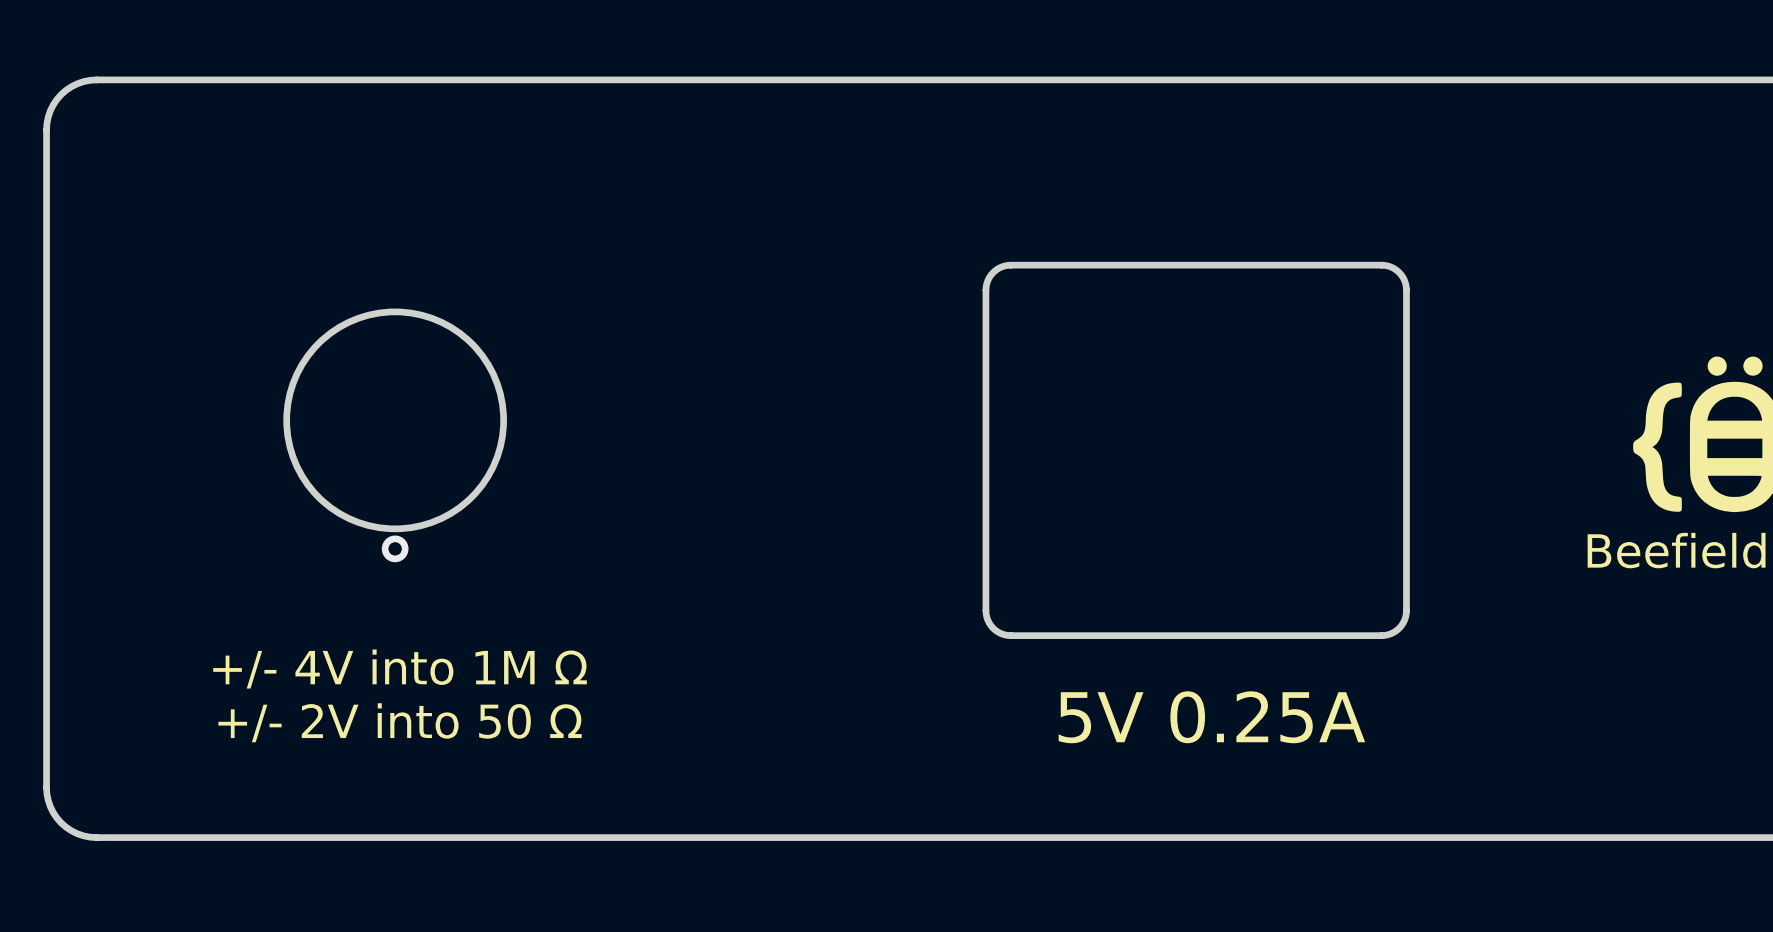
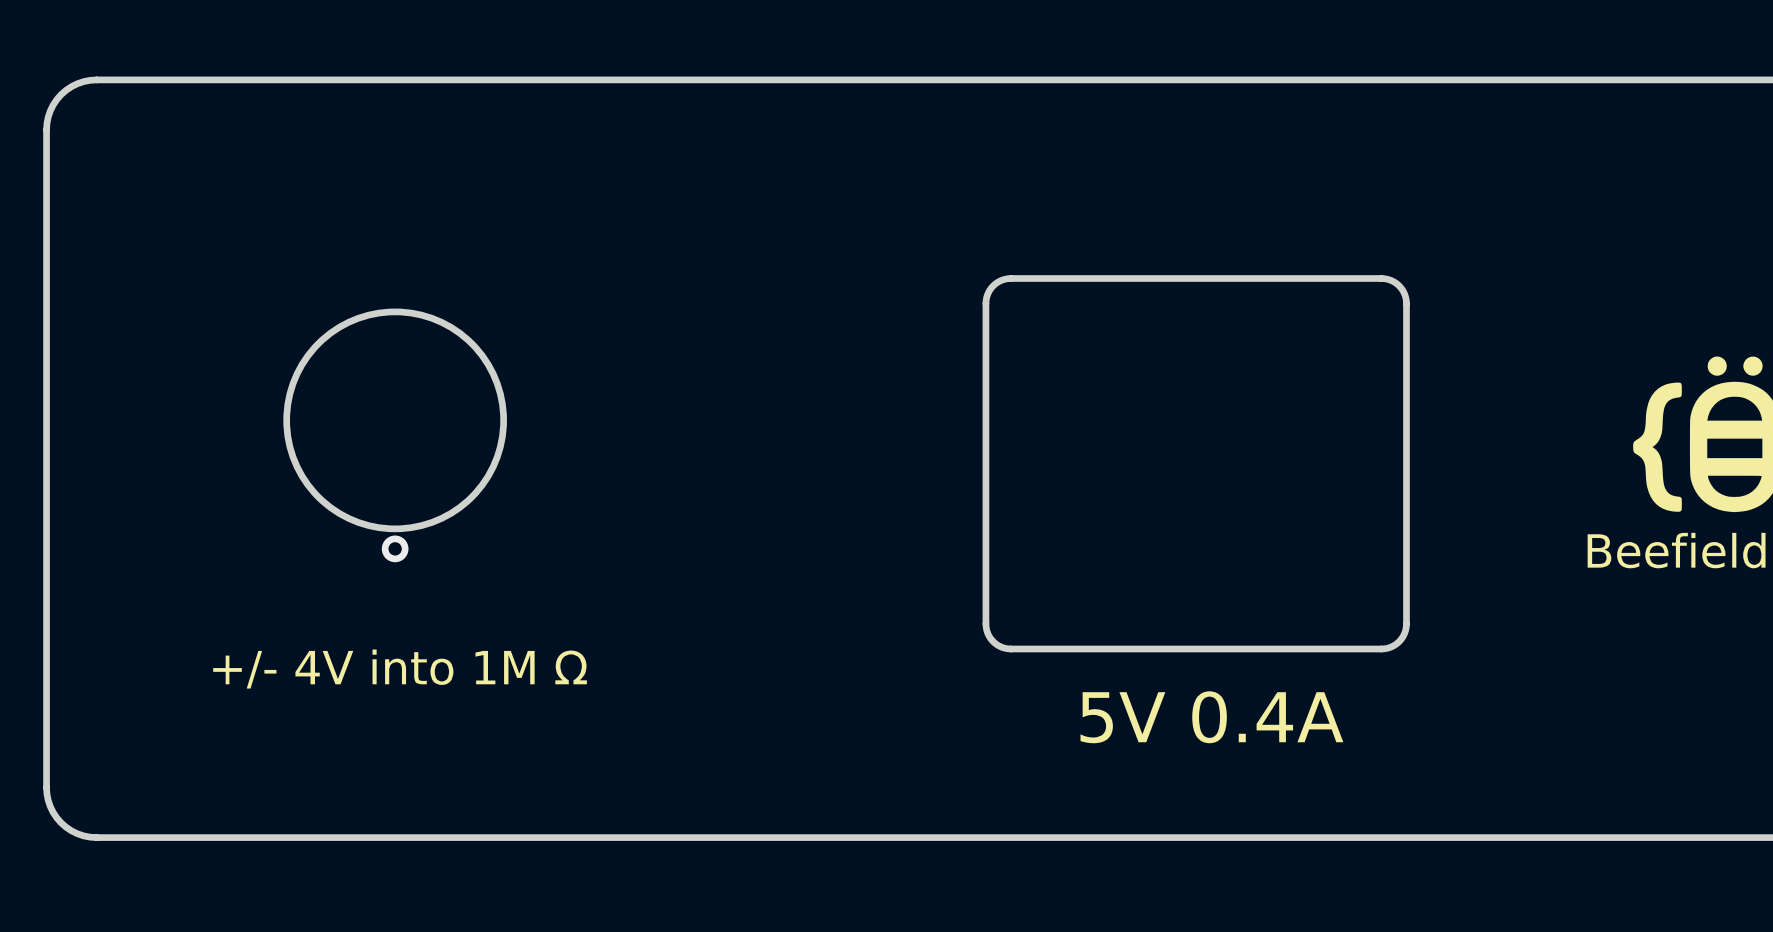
board edge: (985, 303) (986, 286) (989, 277) (998, 268) (1010, 265) (1384, 265) (1394, 268) (1402, 276) (1406, 287) (1406, 303) -> (985, 303) (987, 293) (993, 285) (1001, 280) (1010, 278) (1381, 278) (1391, 280) (1399, 285) (1404, 293) (1406, 303)
board edge: (985, 610) (987, 620) (993, 628) (1001, 633) (1010, 635) (1381, 635) (1391, 633) (1399, 628) (1404, 620) (1406, 610) -> (985, 610) (986, 627) (989, 636) (998, 645) (1010, 649) (1384, 648) (1396, 643) (1403, 636) (1406, 627) (1406, 610)
text: 5V 0.25A (1211, 717) -> 5V 0.4A (1211, 717)
text: +/- 2V into 50 Ω (400, 722) -> none

